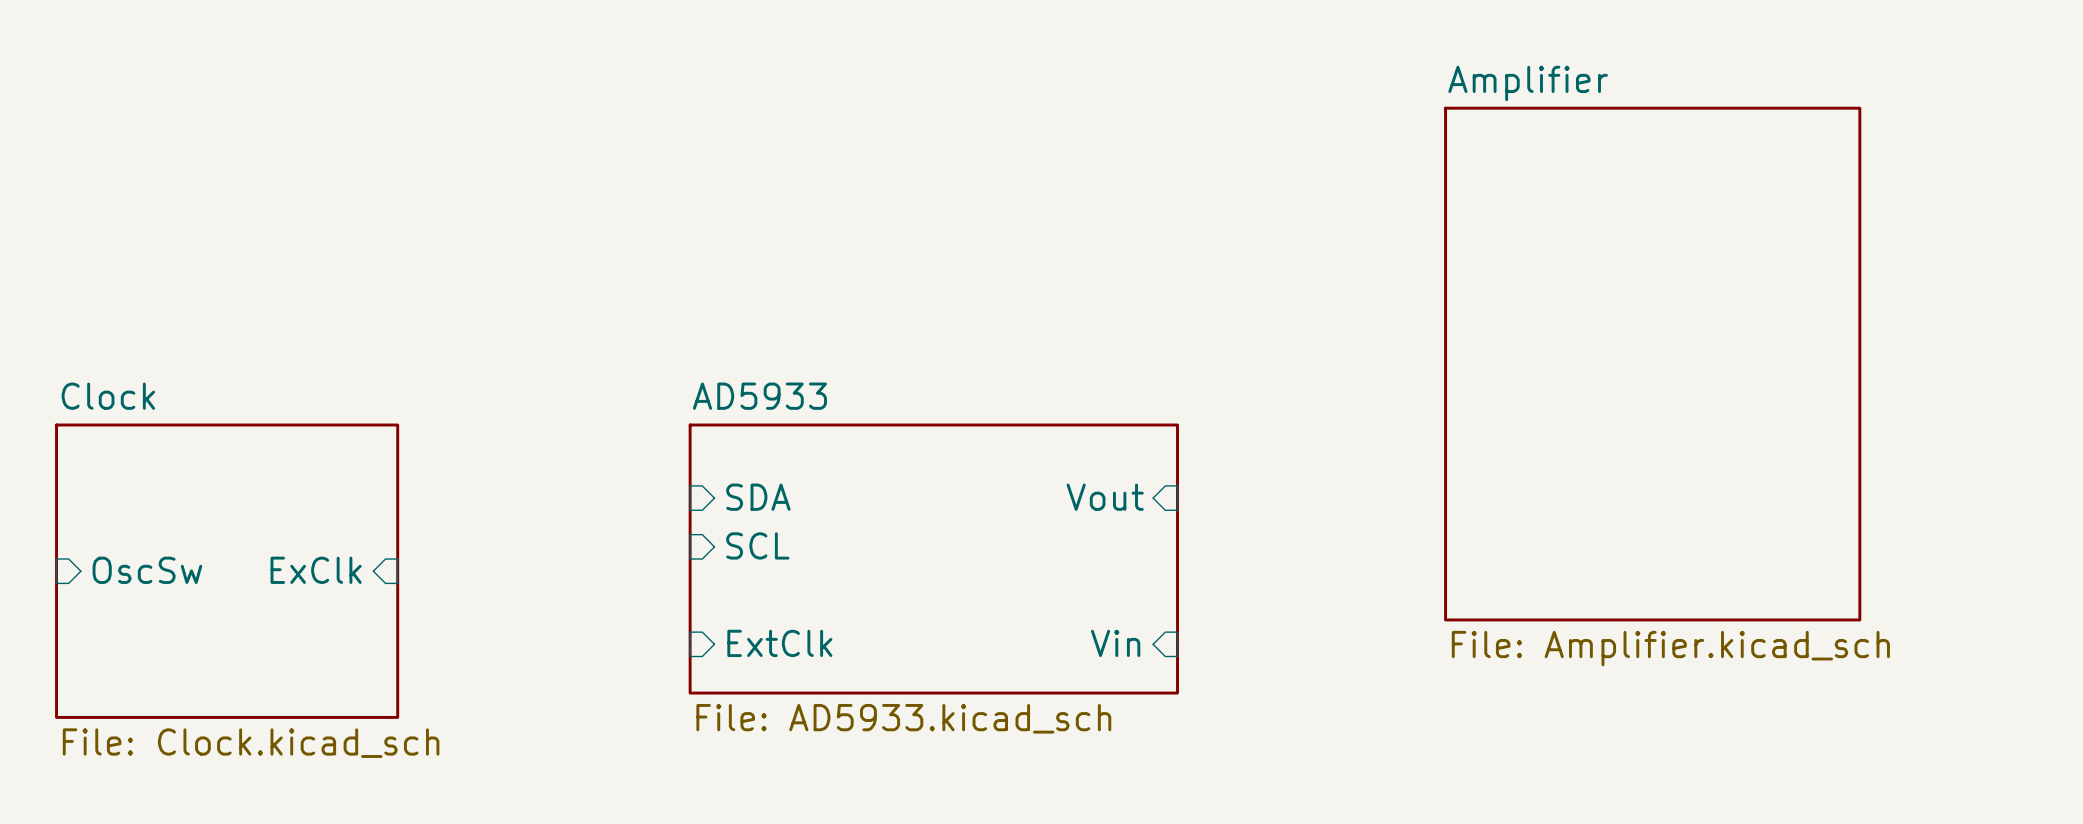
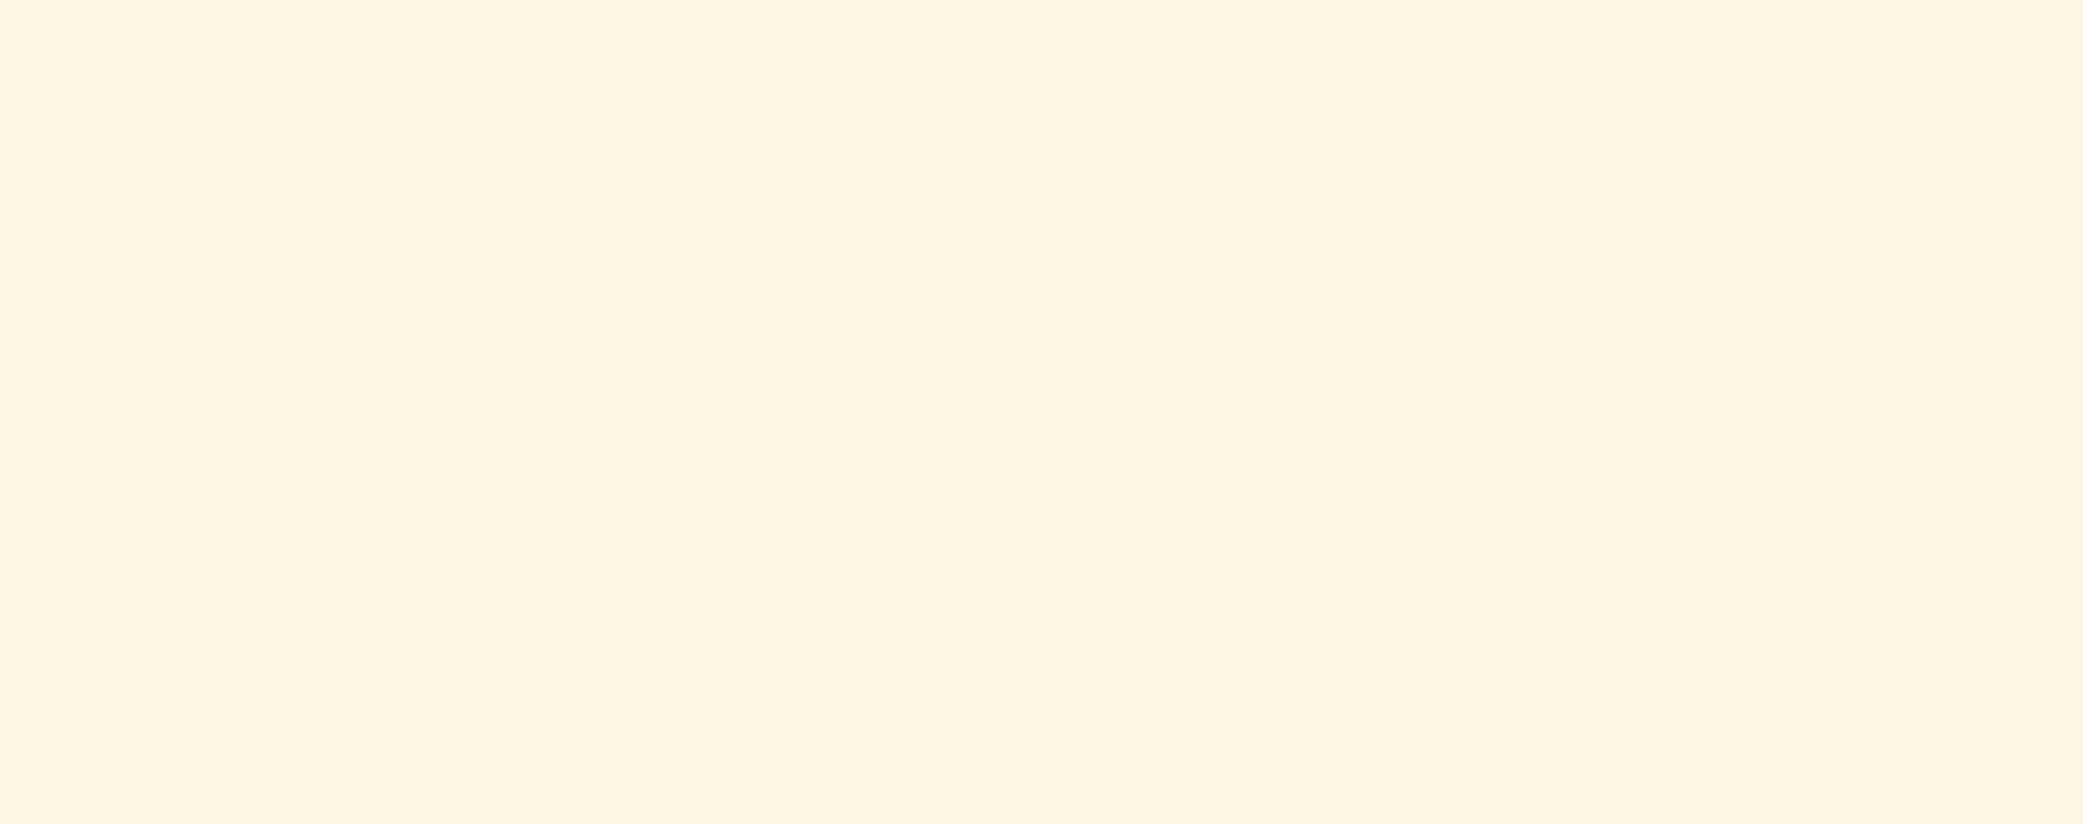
sheet Amplifier: File: Amplifier.kicad_sch (1652, 364) -> none
sheet pin: SDA (758, 497) -> none
sheet pin: Vout (1105, 497) -> none
sheet pin: SCL (757, 545) -> none
sheet AD5933: File: AD5933.kicad_sch (933, 559) -> none
sheet pin: OscSw (147, 570) -> none
sheet pin: ExClk (316, 570) -> none
sheet Clock: File: Clock.kicad_sch (227, 571) -> none
sheet pin: ExtClk (779, 643) -> none
sheet pin: Vin (1115, 643) -> none

